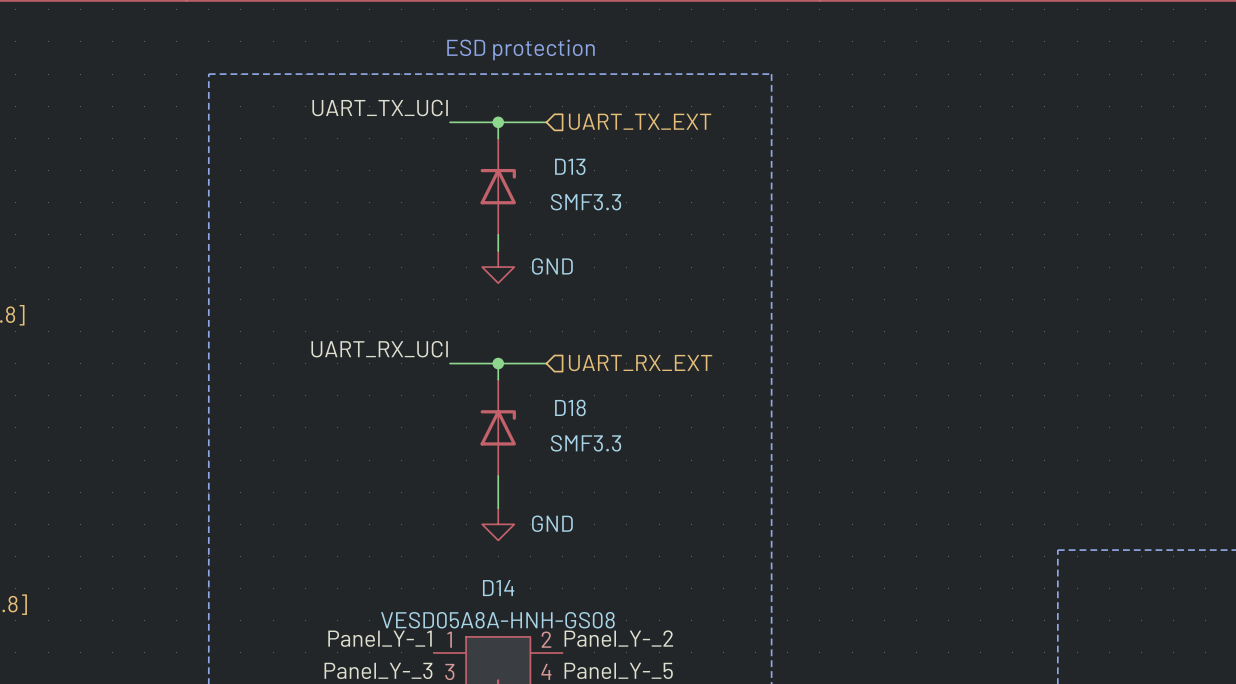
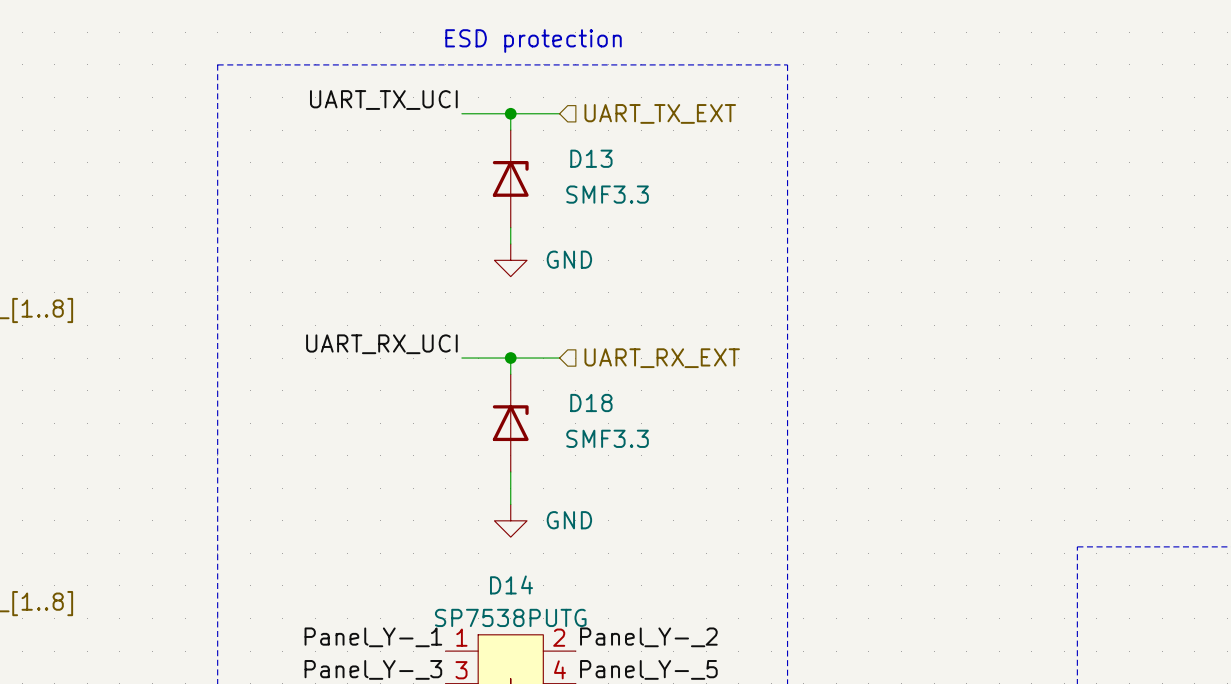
D14 value: VESD05A8A-HNH-GS08 (497, 620) -> SP7538PUTG (510, 617)

